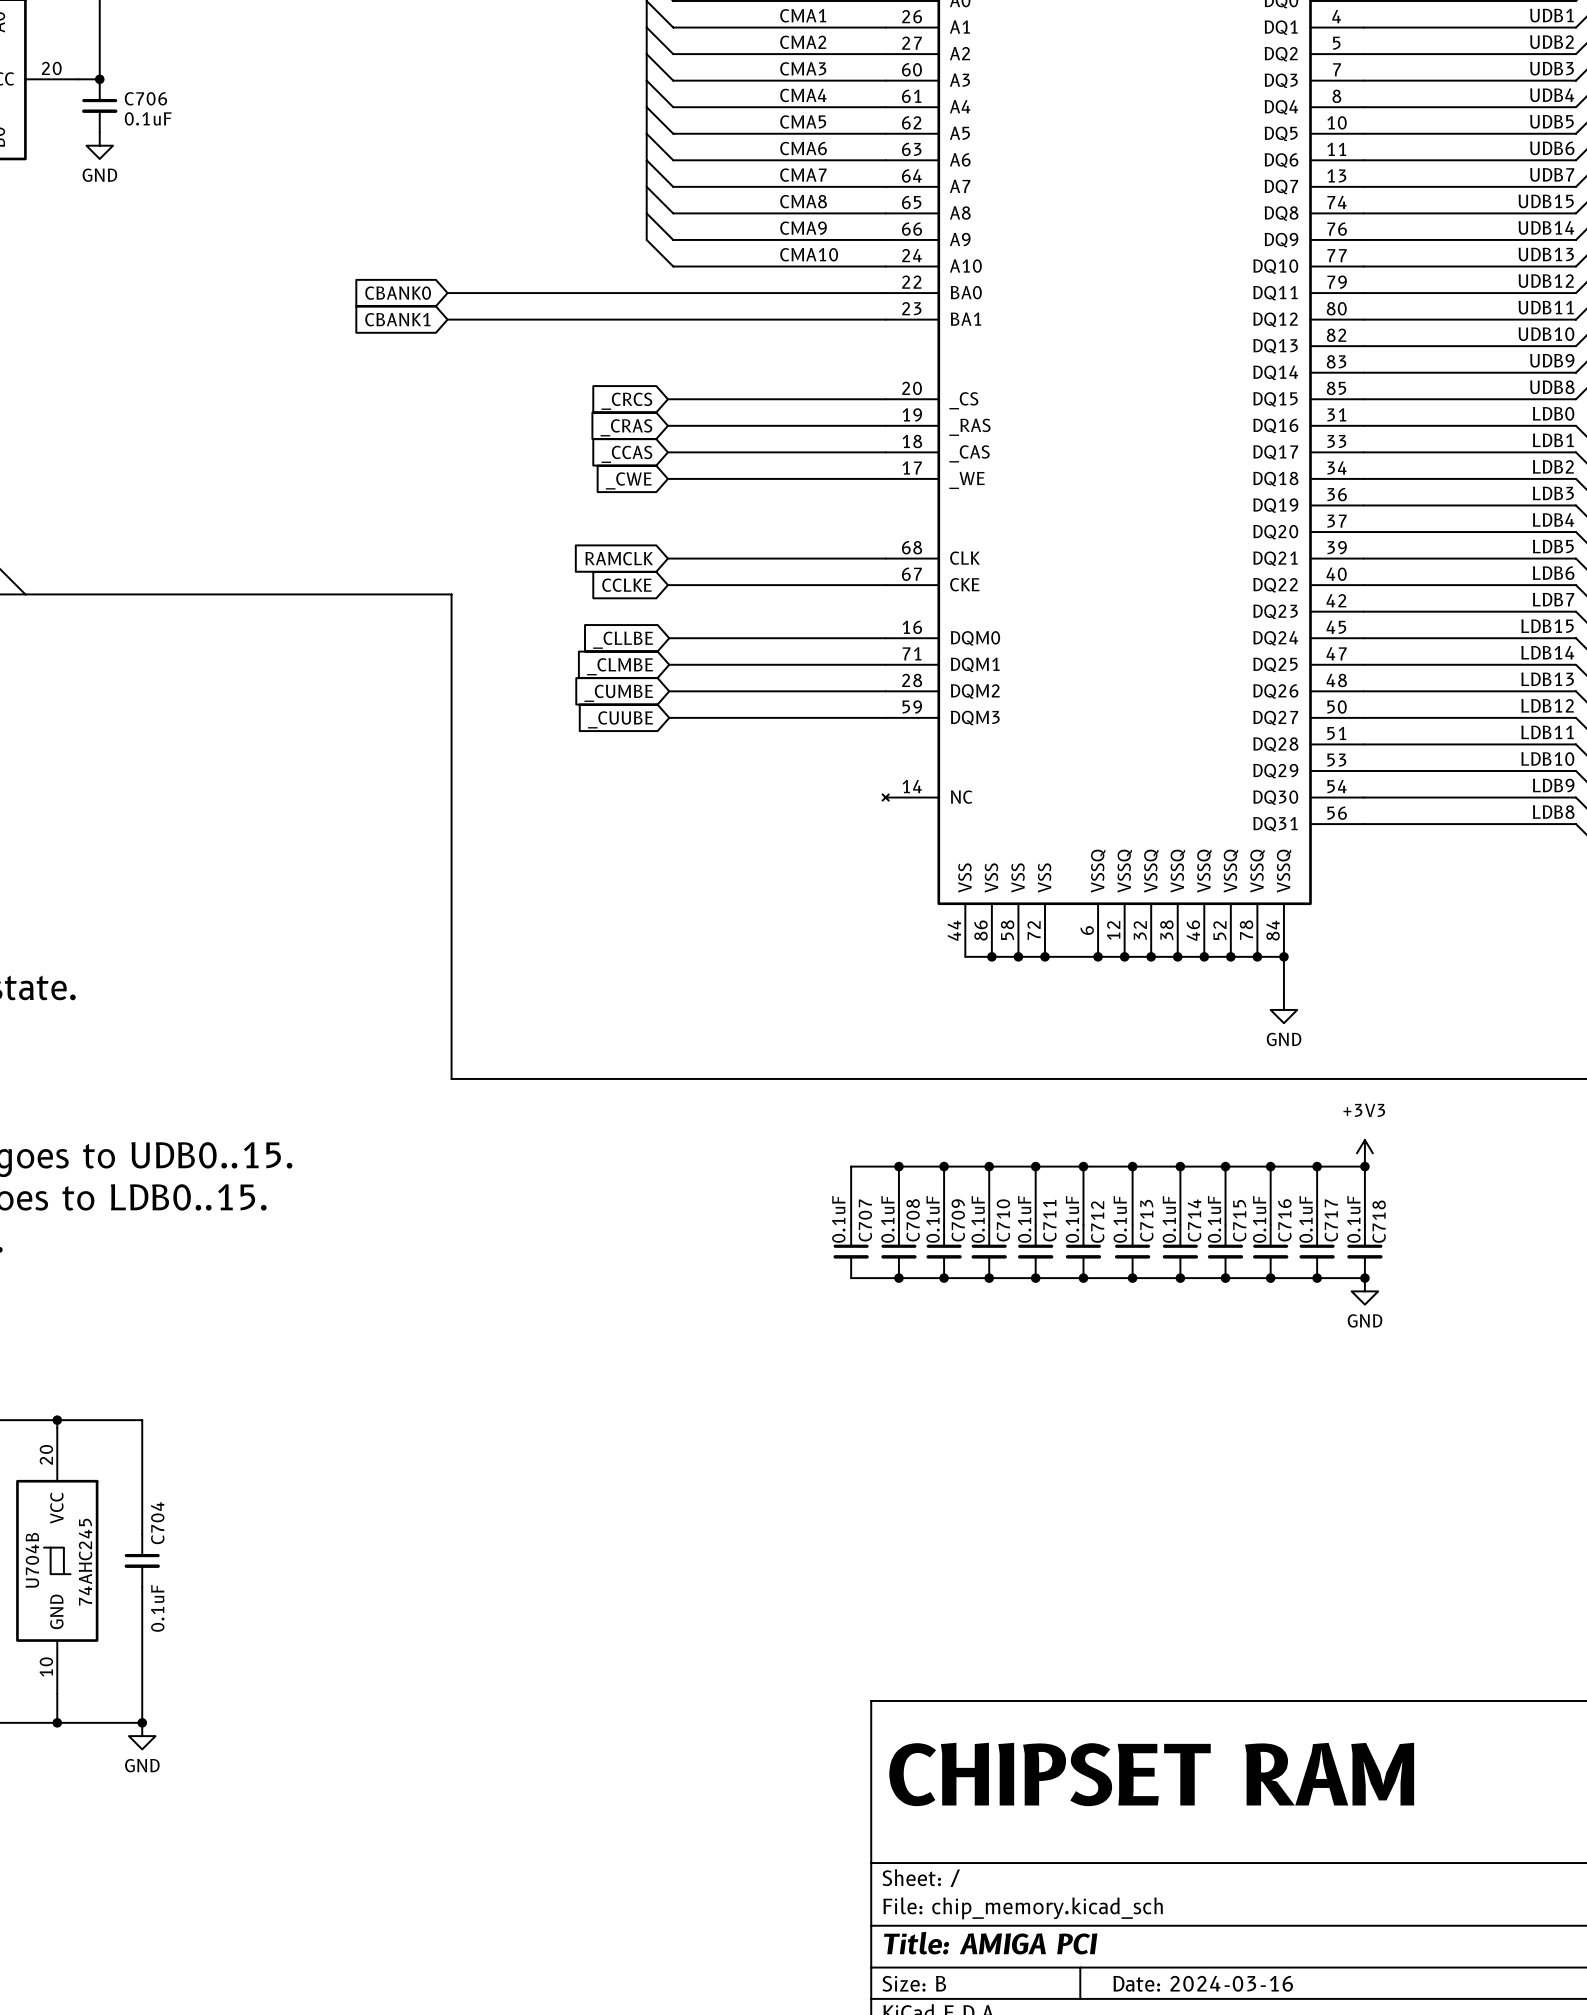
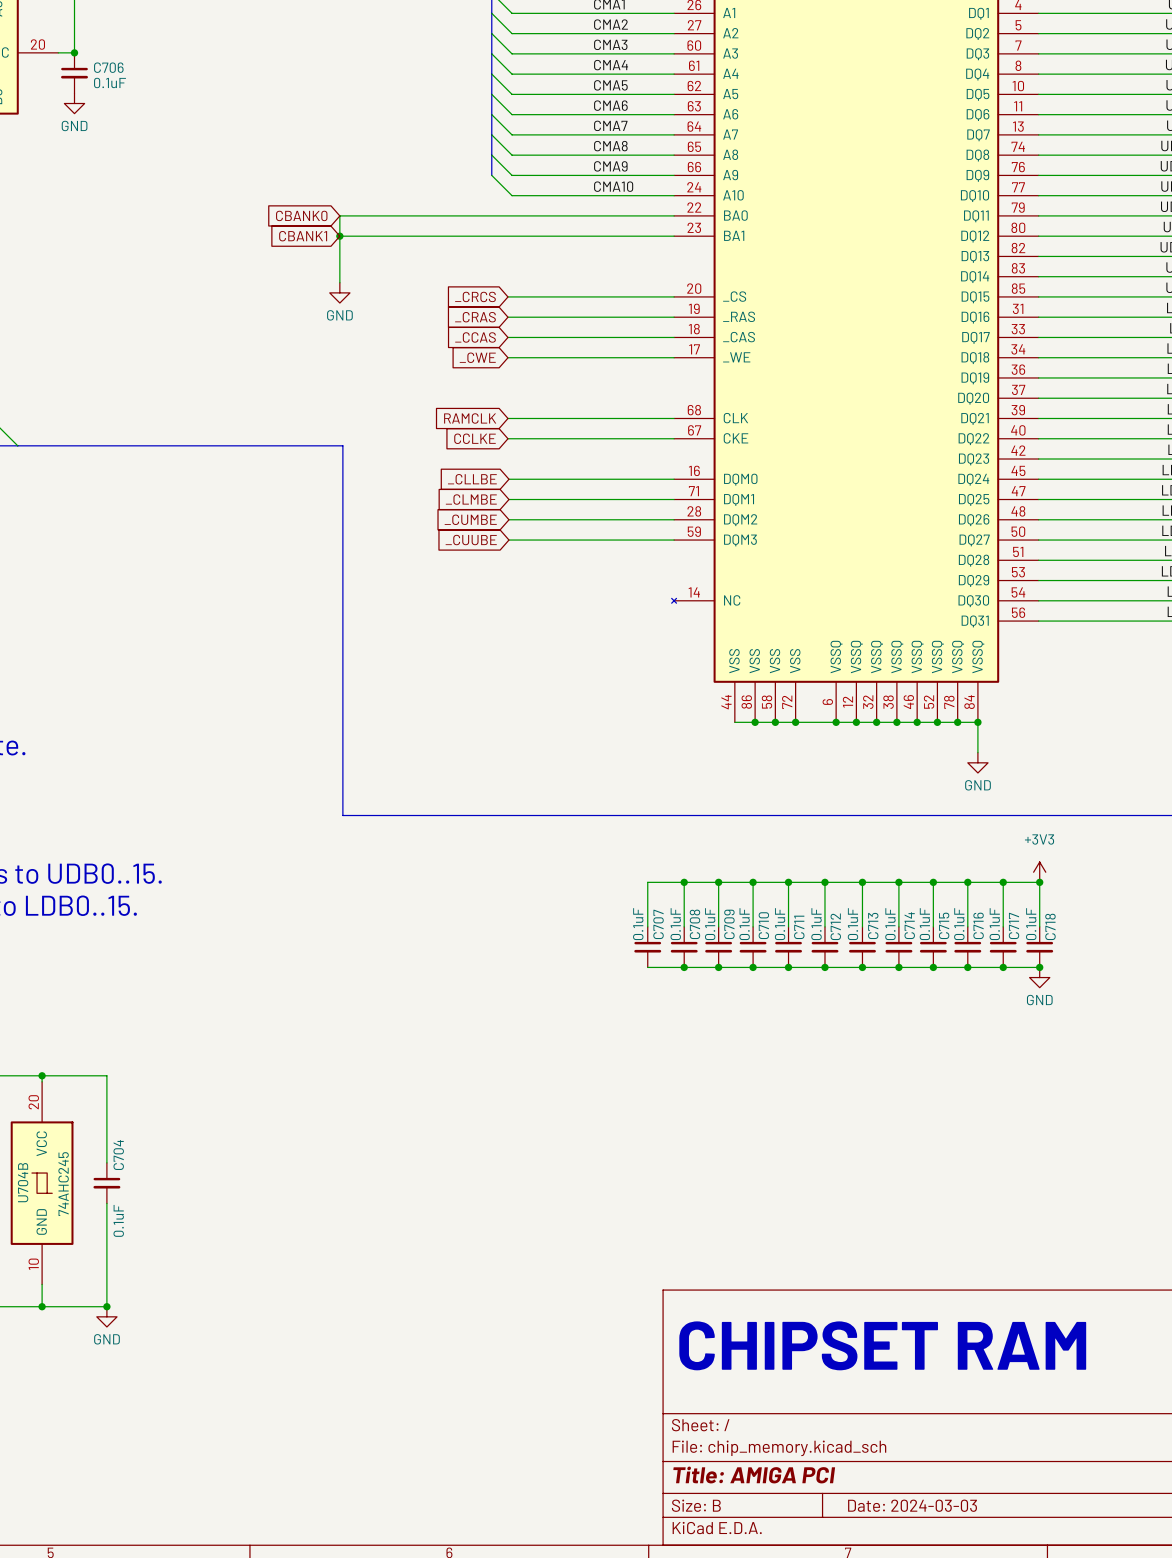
wire: none -> (339, 215) (339, 282)
junction: none -> (339, 236)
power symbol: none -> GND (339, 292)
title block: Date: 2024-03-16 (1203, 1983) -> Date: 2024-03-03 (912, 1505)

